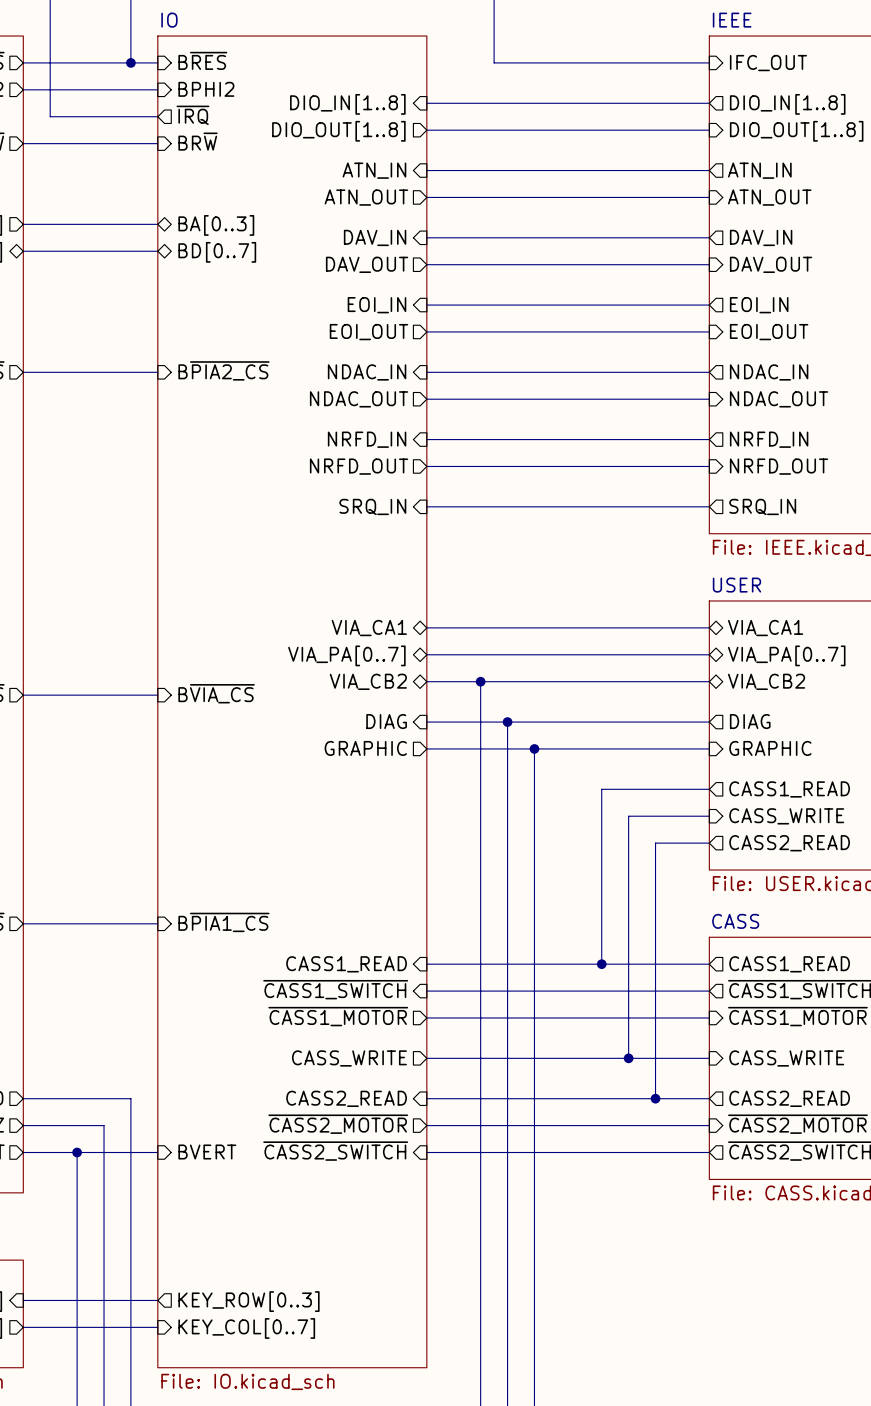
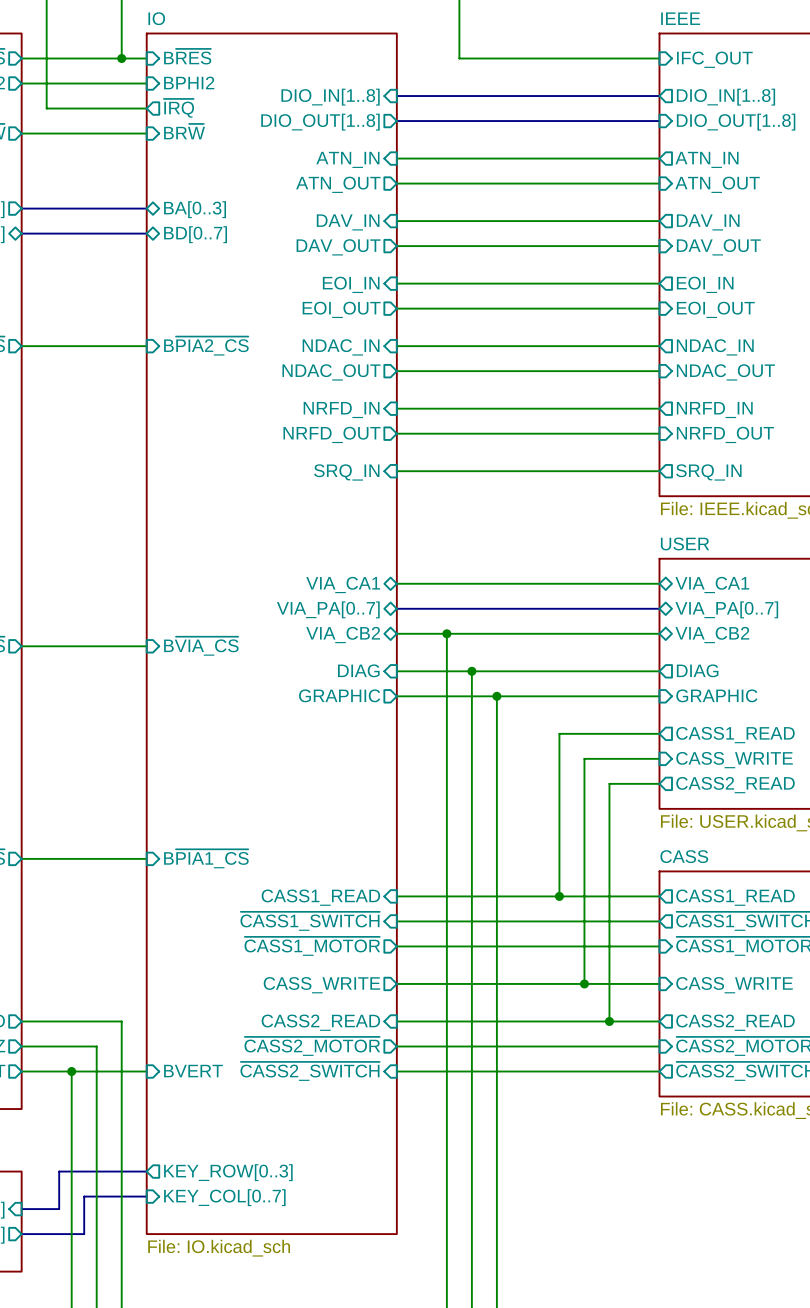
sheet IO: none -> File: IO.kicad_sch (271, 633)
sheet IO: File: IO.kicad_sch (292, 701) -> none
bus: (63, 1300) (157, 1300) -> (59, 1209) (59, 1171) (146, 1171)
sheet pin position: KEY_ROW[0..3] (248, 1301) -> KEY_ROW[0..3] (228, 1172)
bus: (90, 1327) (157, 1327) -> (84, 1234) (84, 1196) (146, 1196)
sheet pin position: KEY_COL[0..7] (246, 1328) -> KEY_COL[0..7] (224, 1197)

